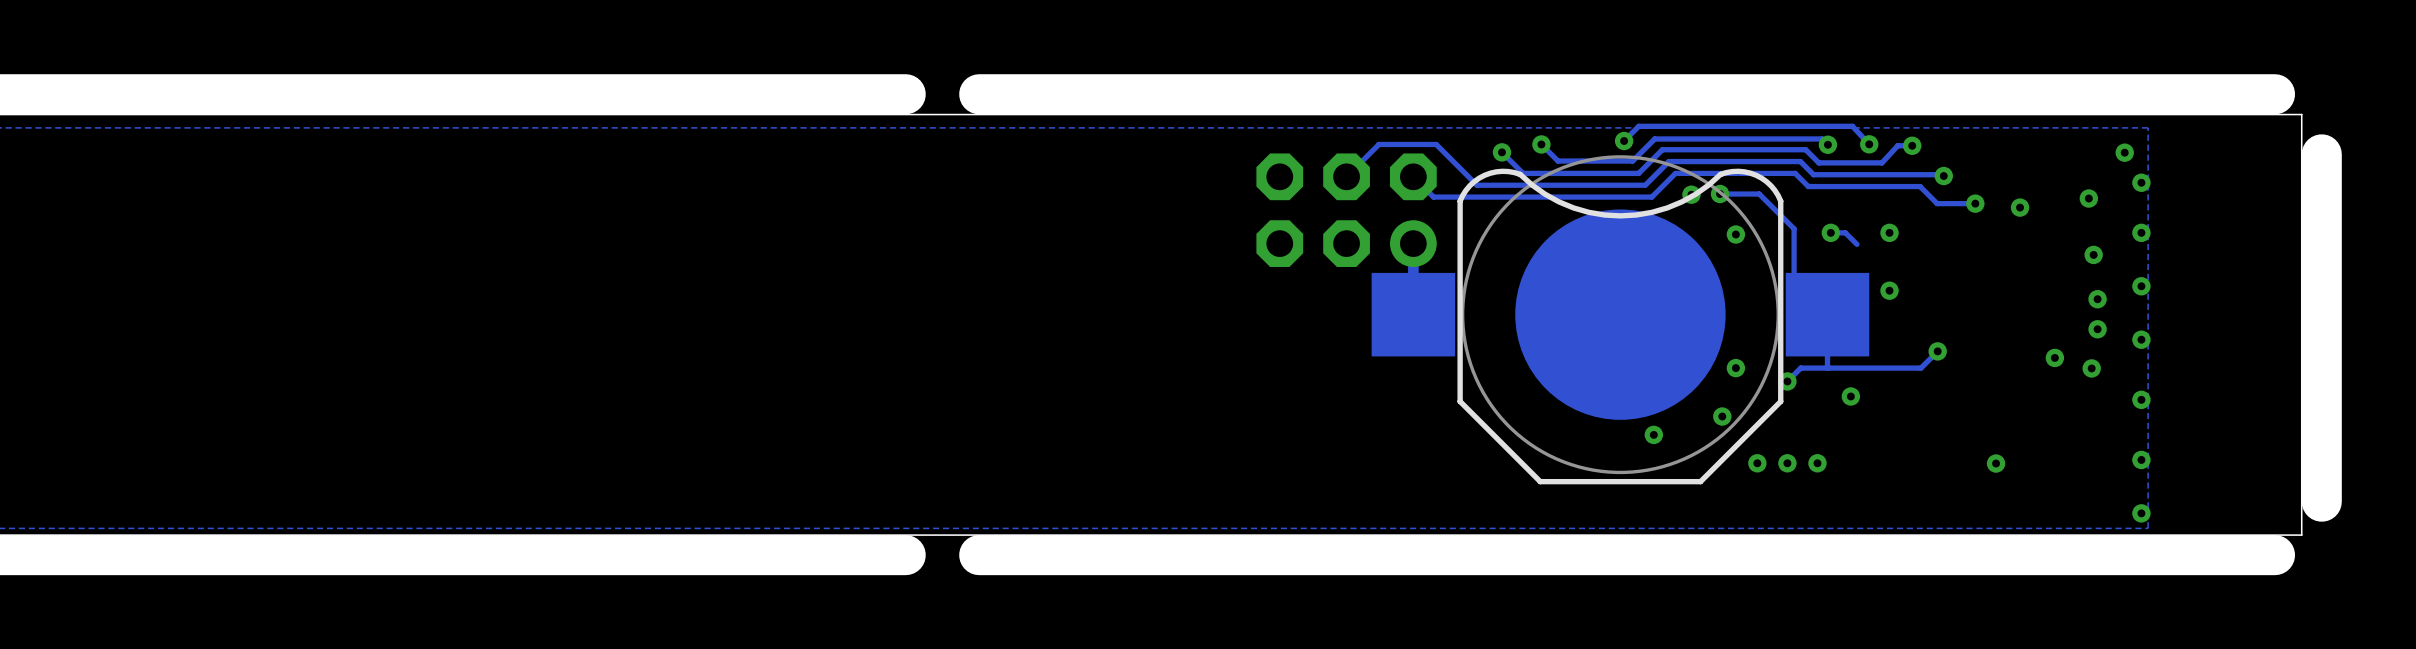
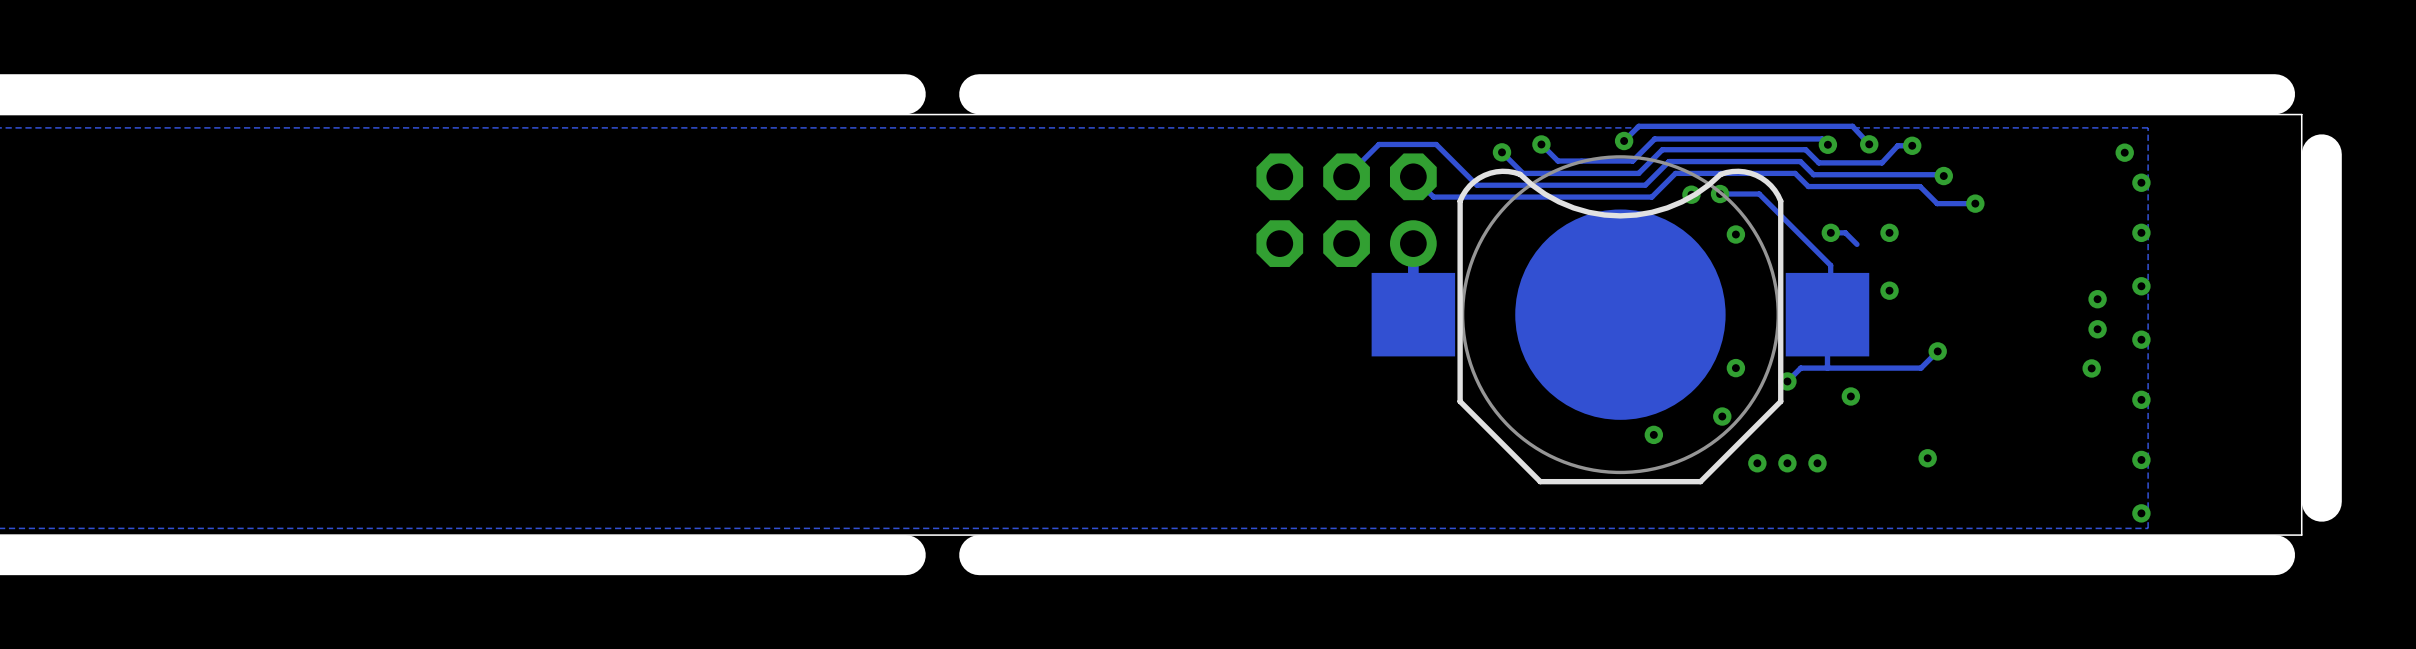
via: (2088, 198) -> none
via: (2020, 207) -> none
track: (1794, 228) (1794, 281) -> (1794, 228) (1830, 265) (1830, 311)
via: (2093, 254) -> none
via: (2054, 357) -> none
via position: (1996, 463) -> (1927, 458)

